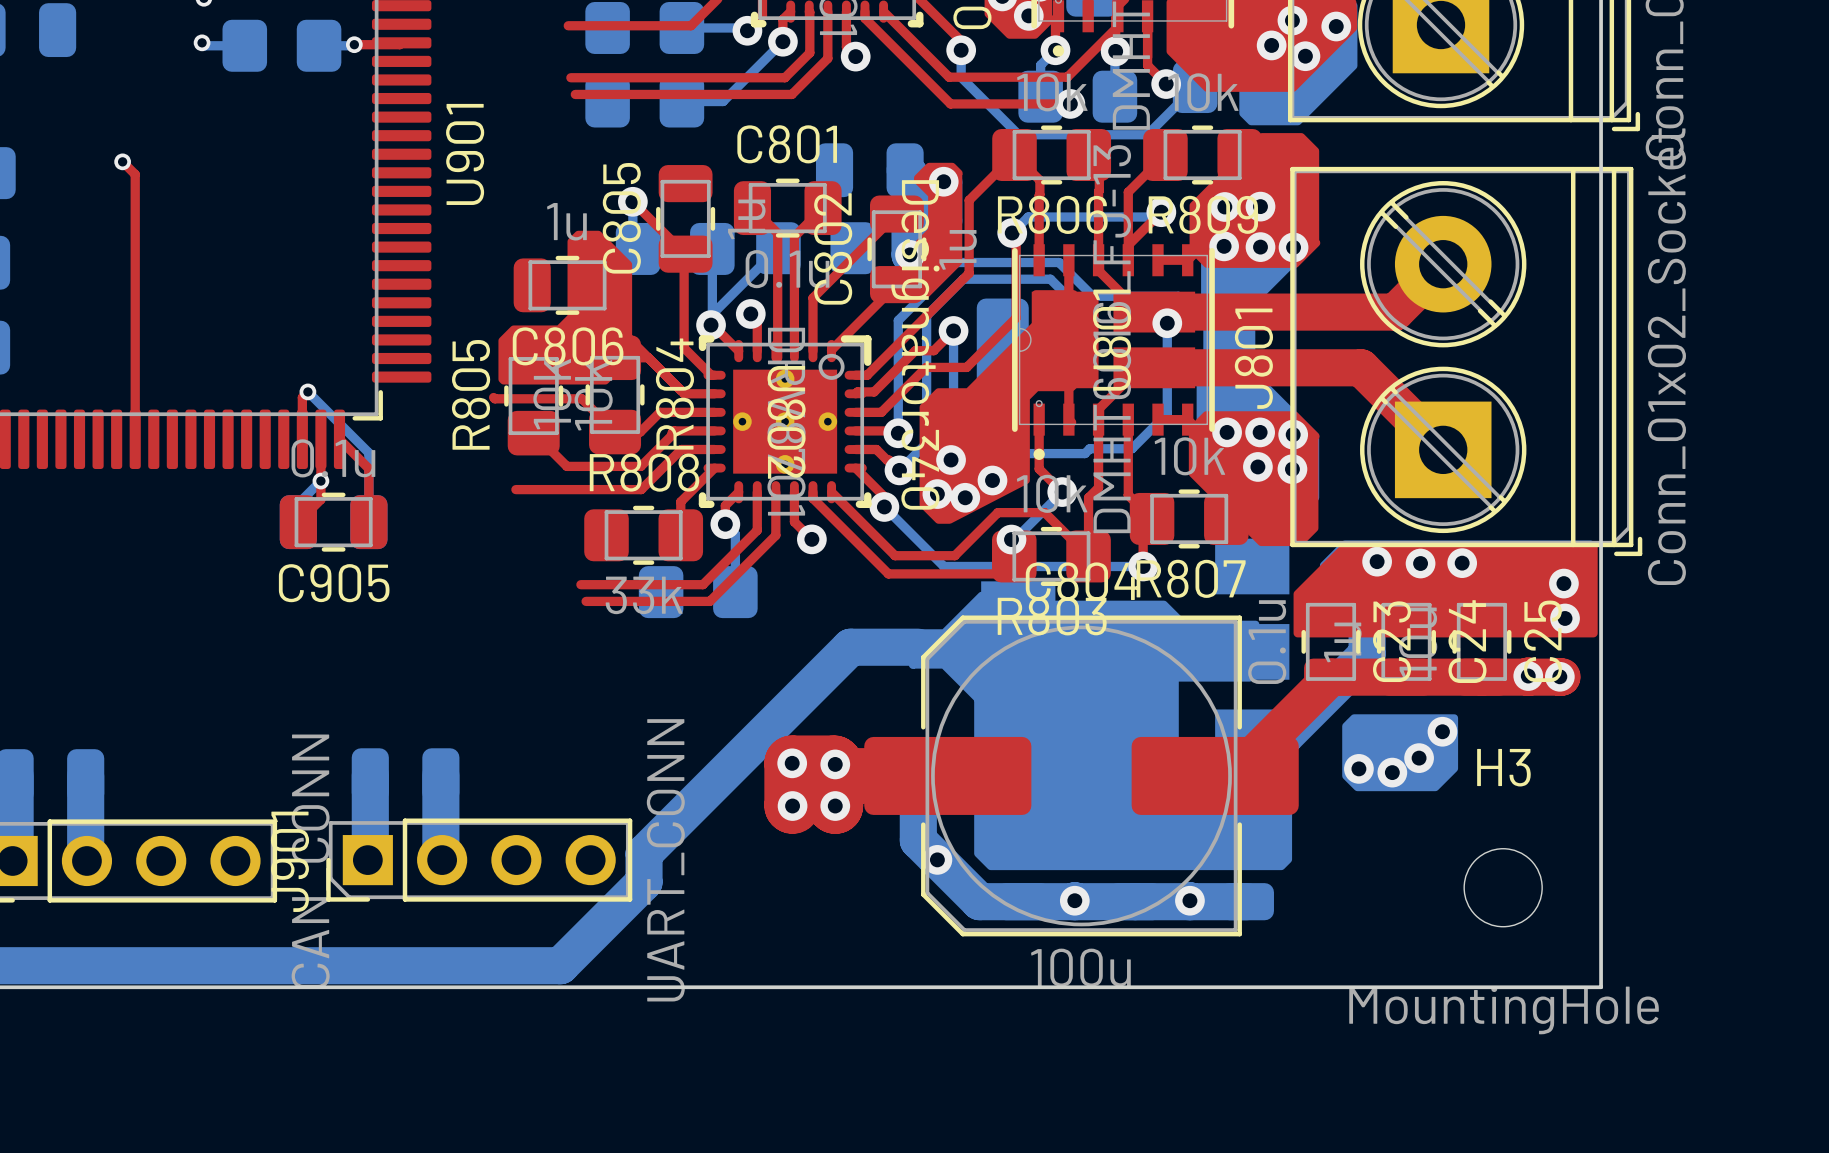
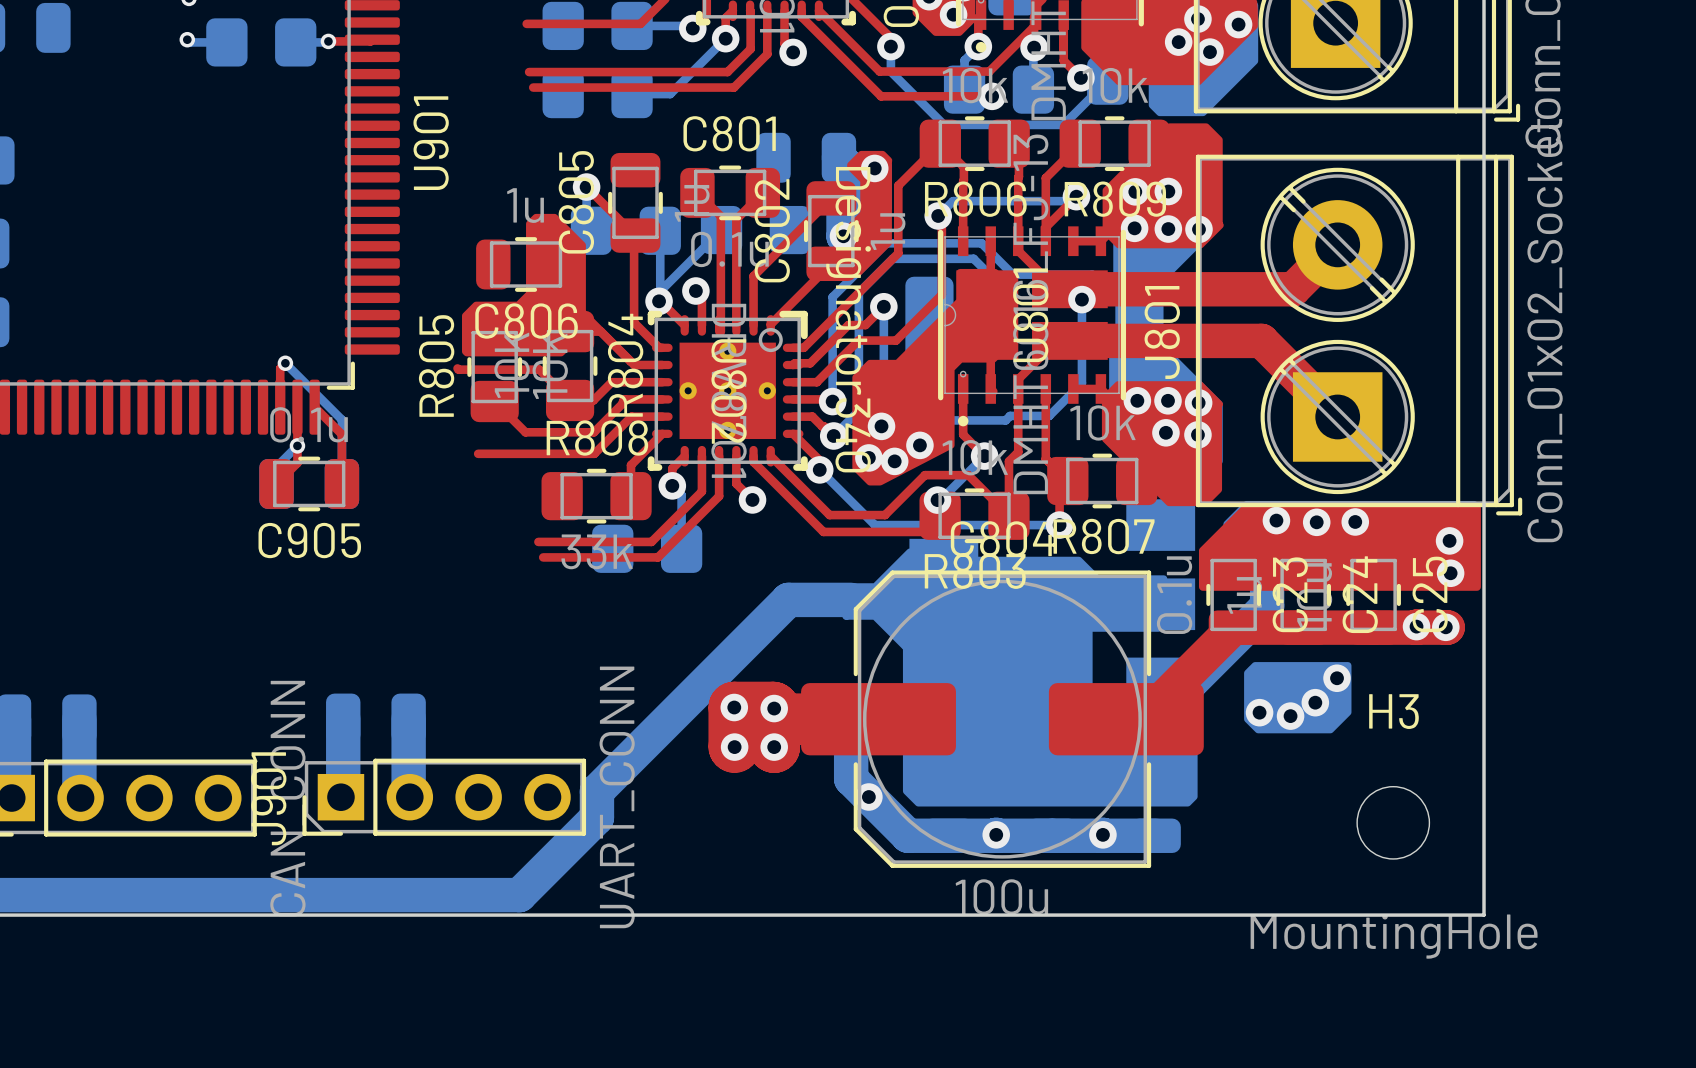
top track: (122, 161) (135, 174) (135, 439) -> none
via: (122, 161) -> none

